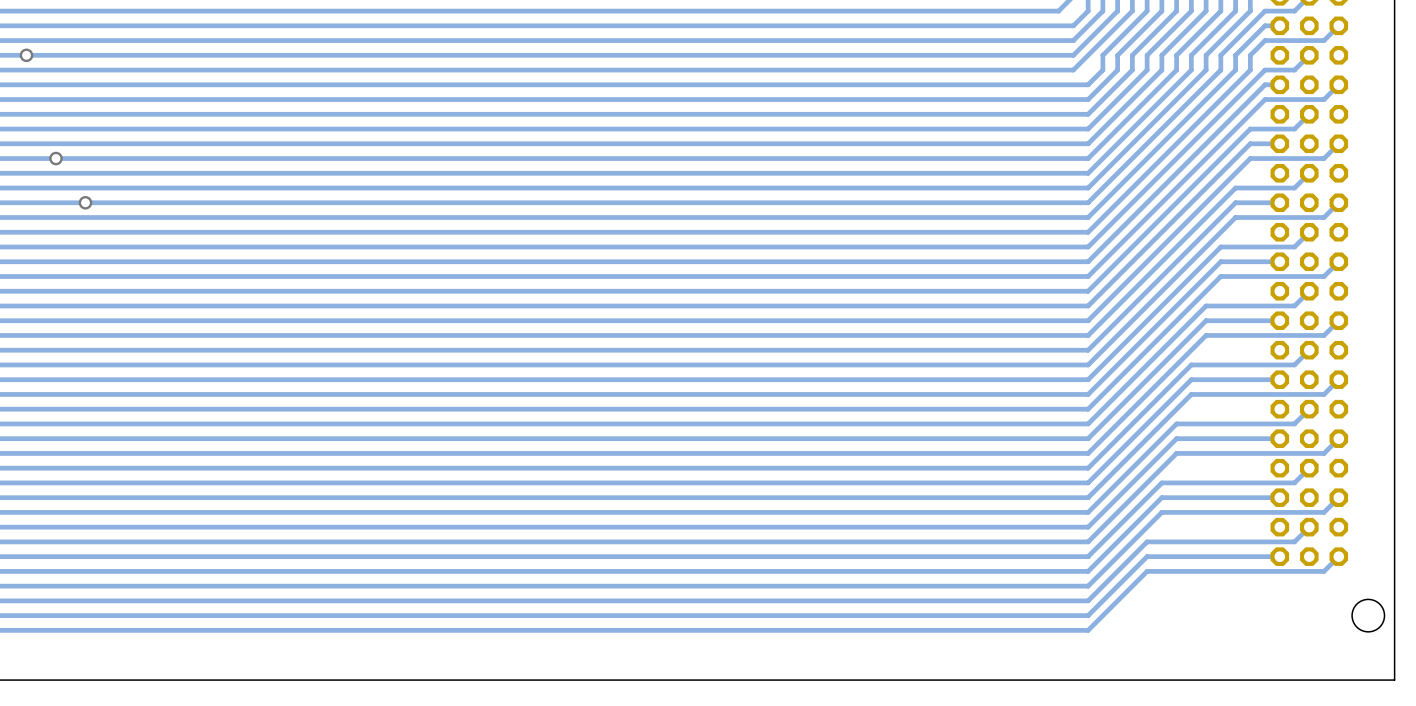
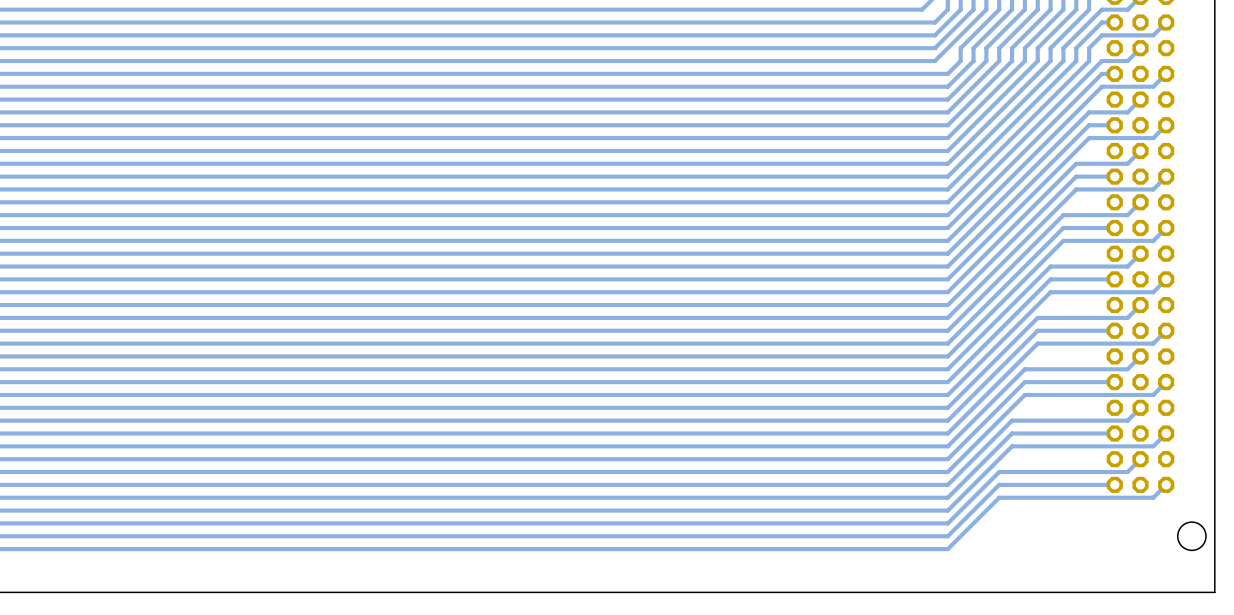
via: (26, 55) -> none
via: (55, 158) -> none
via: (85, 202) -> none

